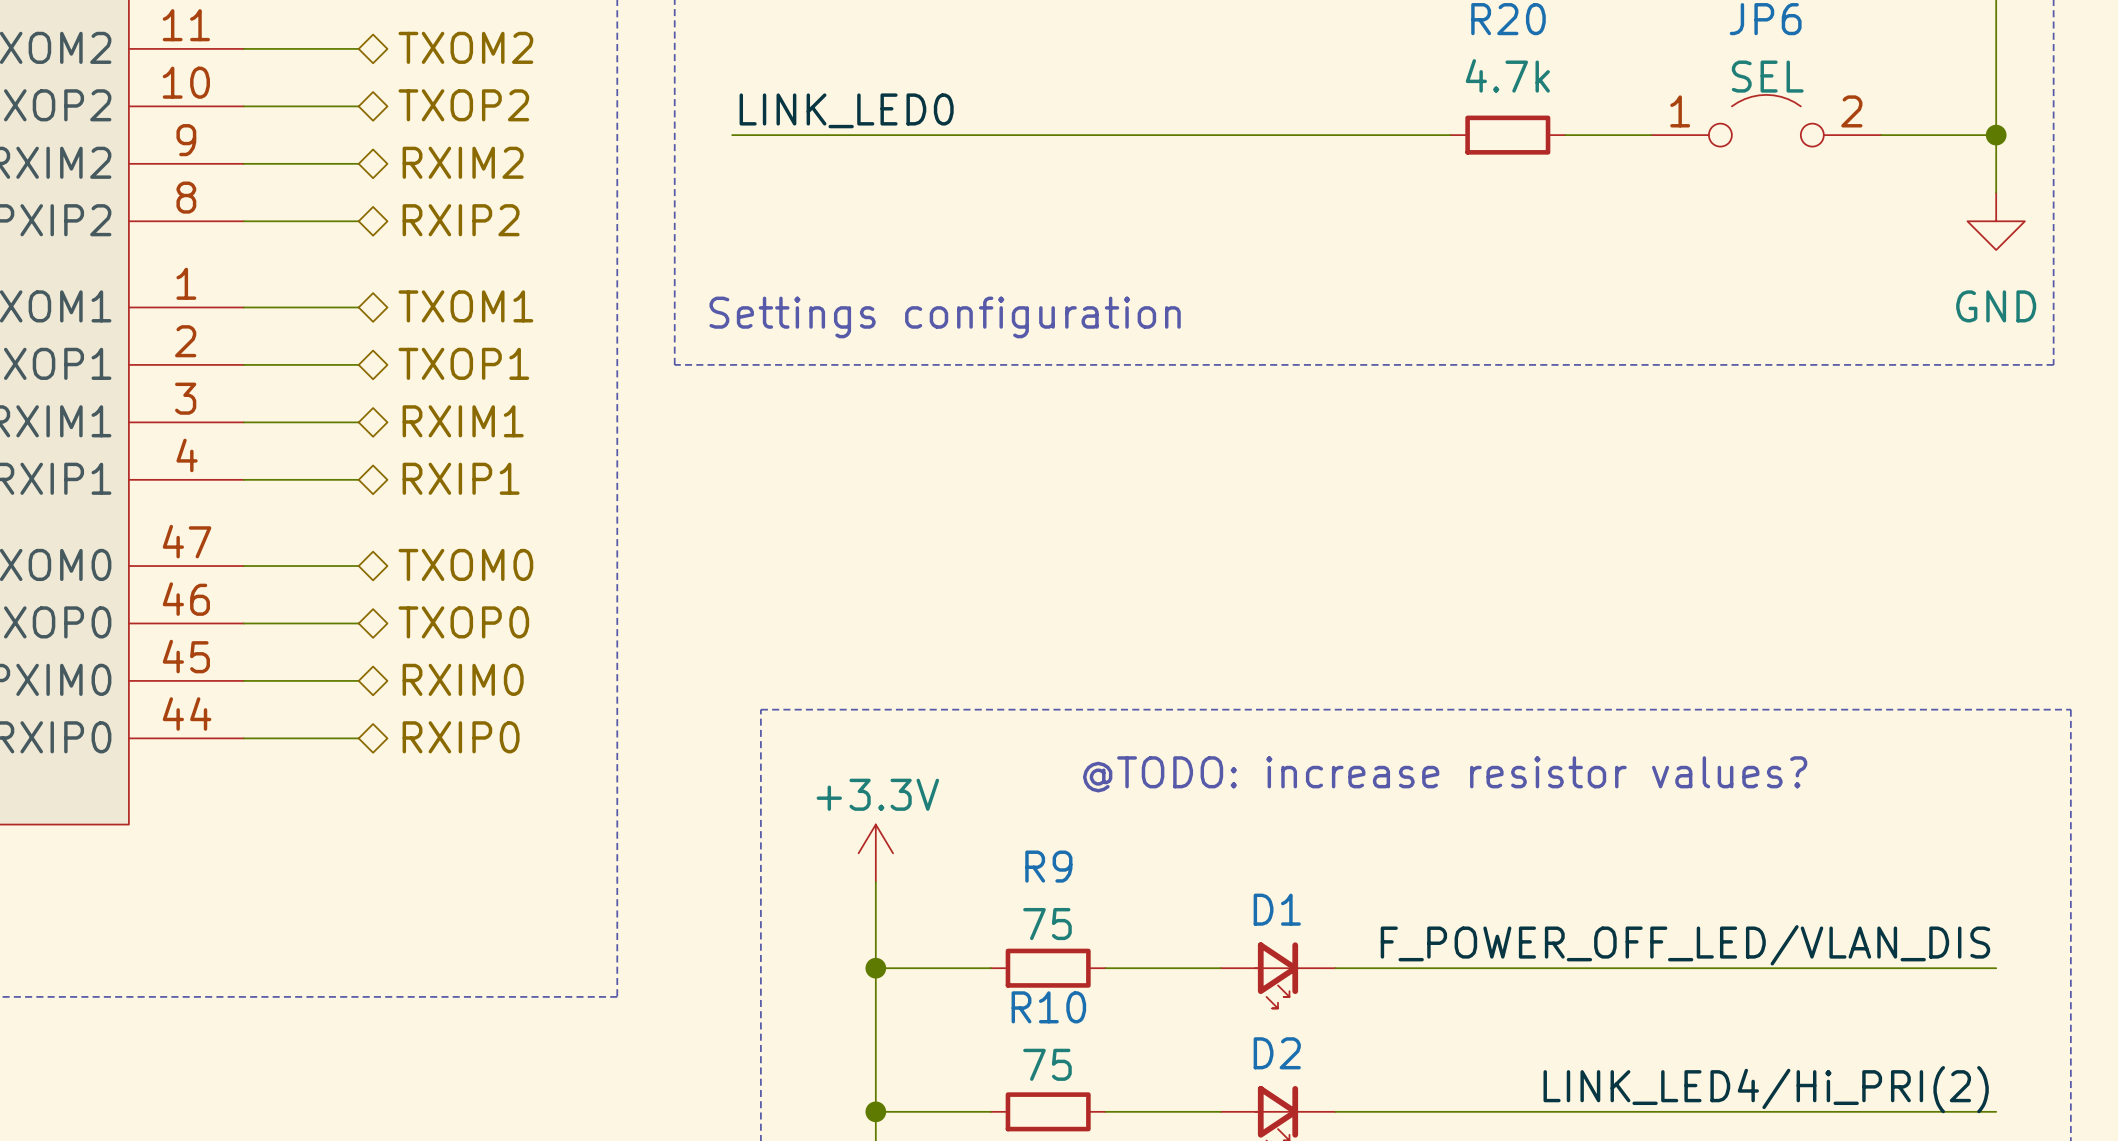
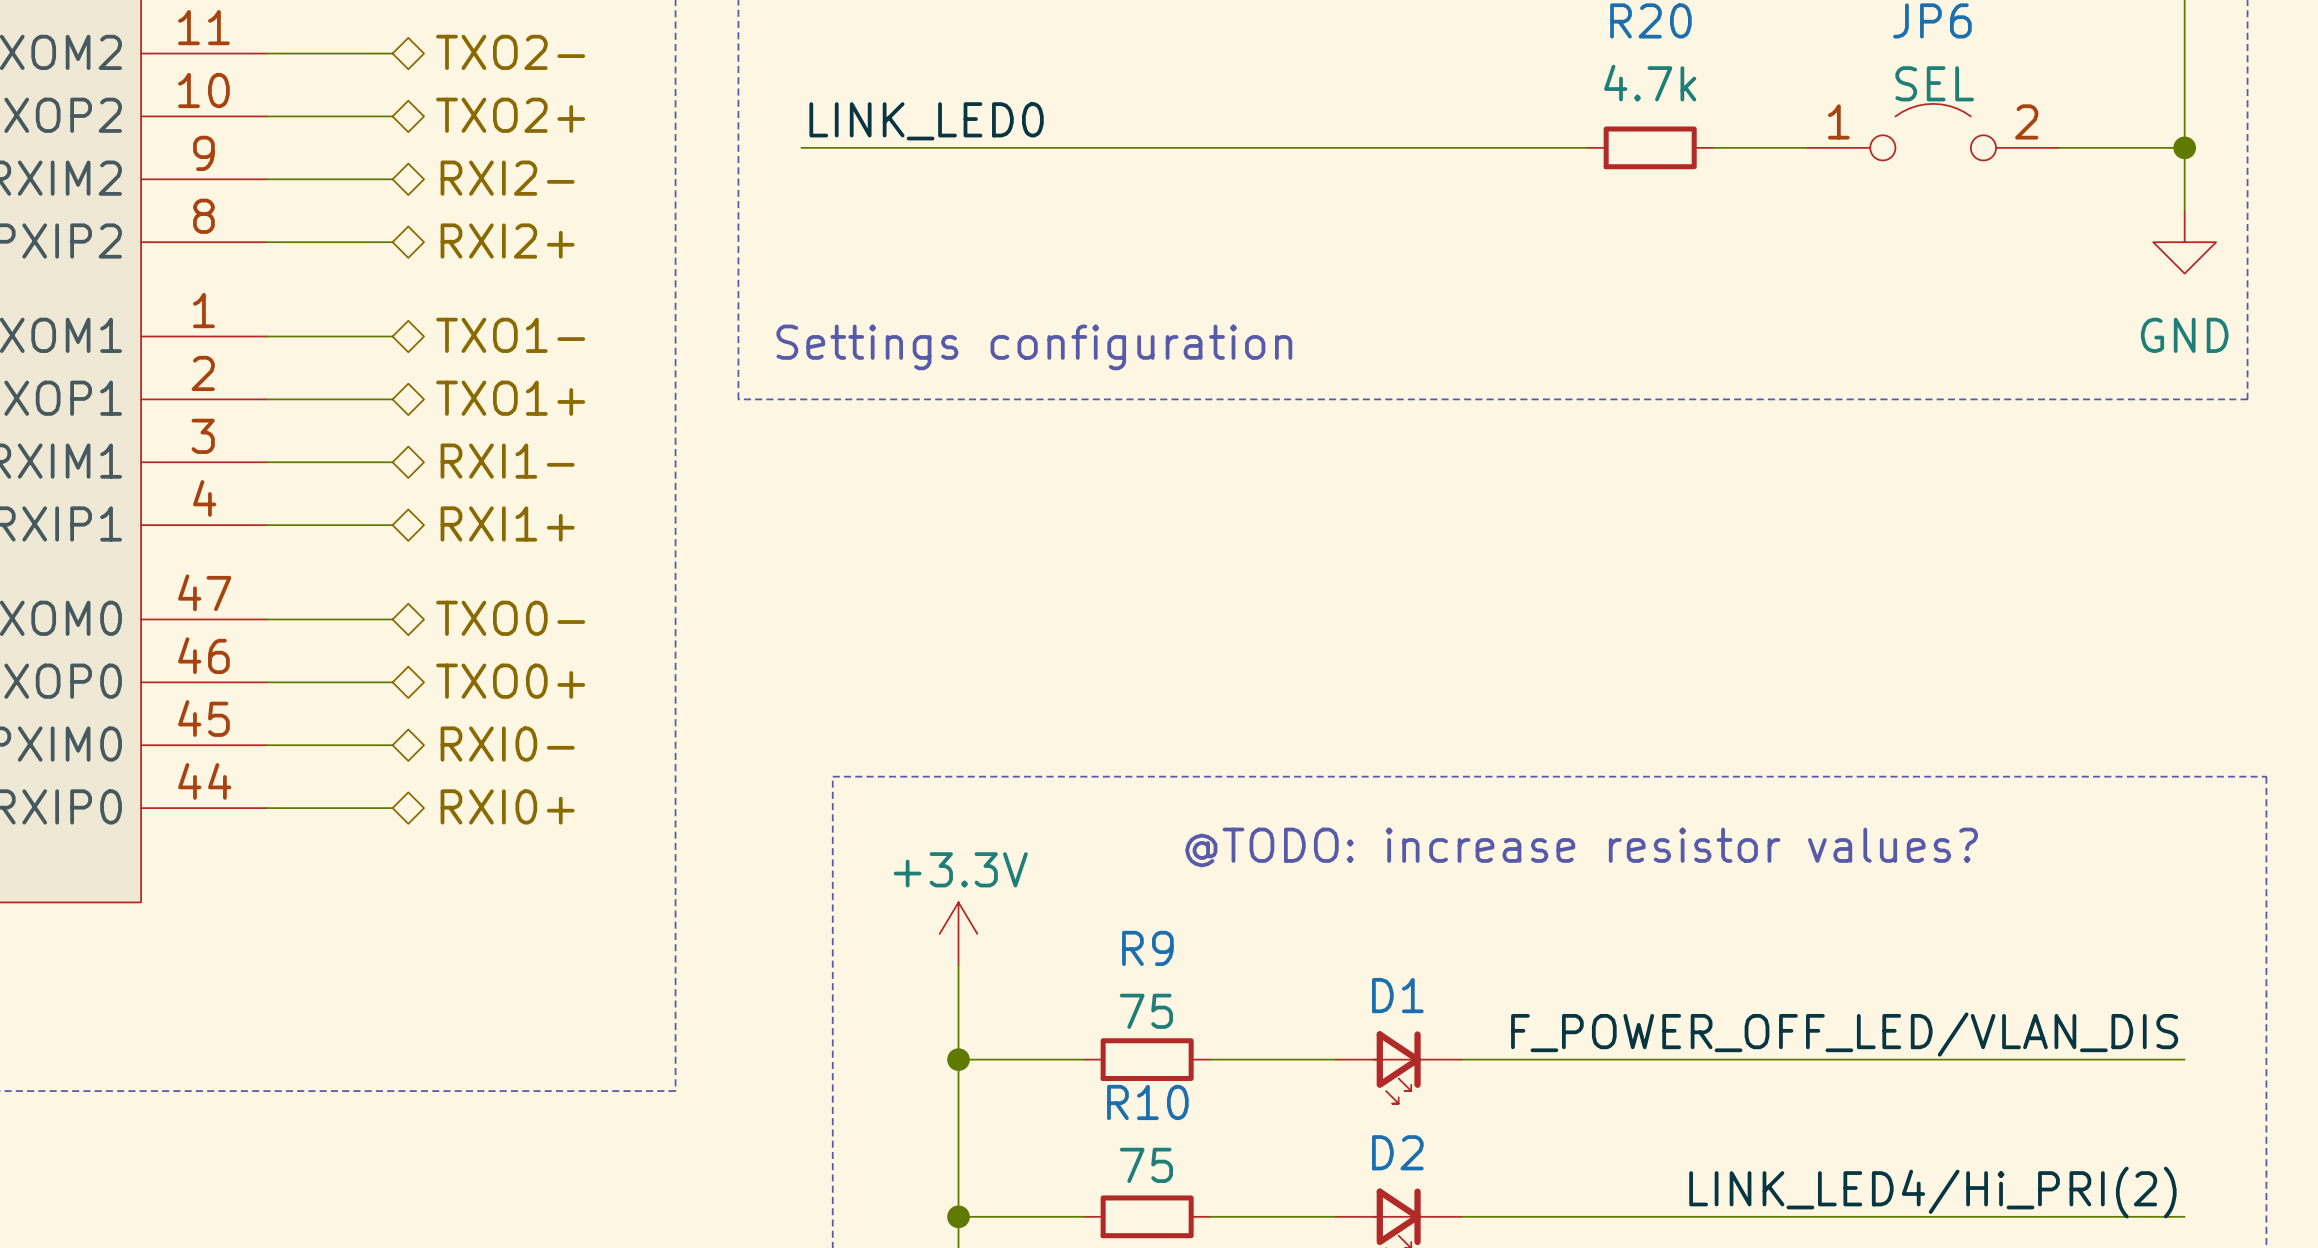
hierarchical label: TXOM2 (465, 47) -> TXO2- (510, 52)
hierarchical label: TXOP2 (463, 105) -> TXO2+ (510, 115)
hierarchical label: RXIM2 (463, 162) -> RXI2- (507, 178)
hierarchical label: RXIP2 (461, 220) -> RXI2+ (507, 241)
hierarchical label: TXOM1 (465, 306) -> TXO1- (510, 335)
hierarchical label: TXOP1 (463, 363) -> TXO1+ (510, 398)
hierarchical label: RXIM1 (463, 421) -> RXI1- (507, 461)
hierarchical label: RXIP1 (461, 478) -> RXI1+ (507, 523)
hierarchical label: TXOM0 (465, 564) -> TXO0- (510, 618)
hierarchical label: TXOP0 (463, 622) -> TXO0+ (510, 681)
hierarchical label: RXIM0 (463, 679) -> RXI0- (507, 744)
hierarchical label: RXIP0 (461, 737) -> RXI0+ (507, 806)

